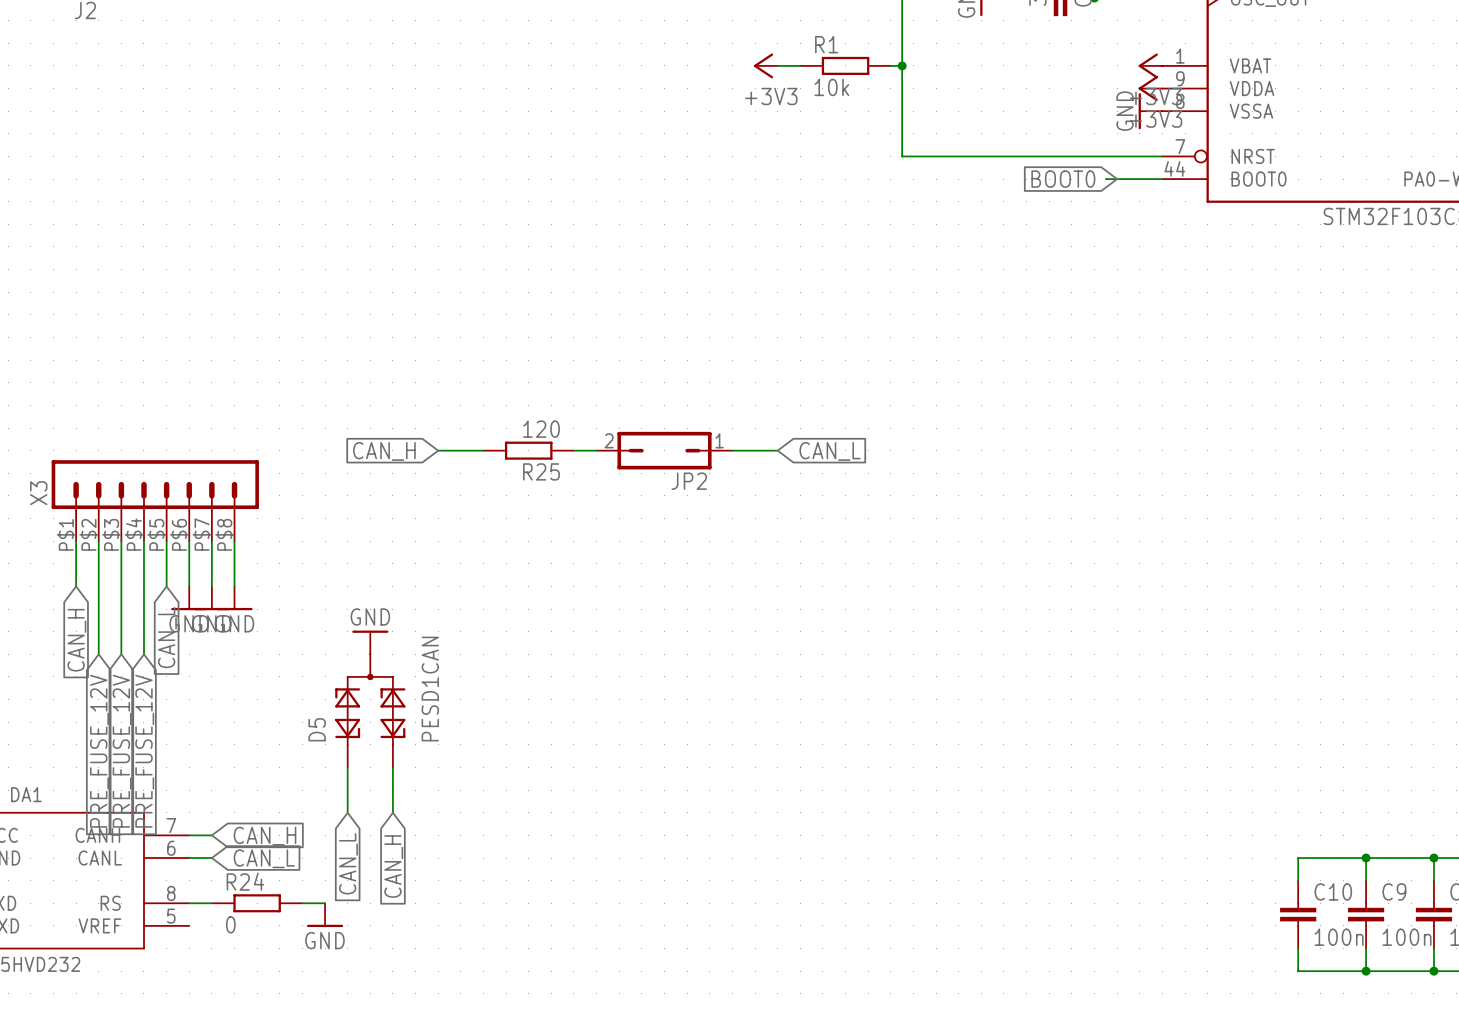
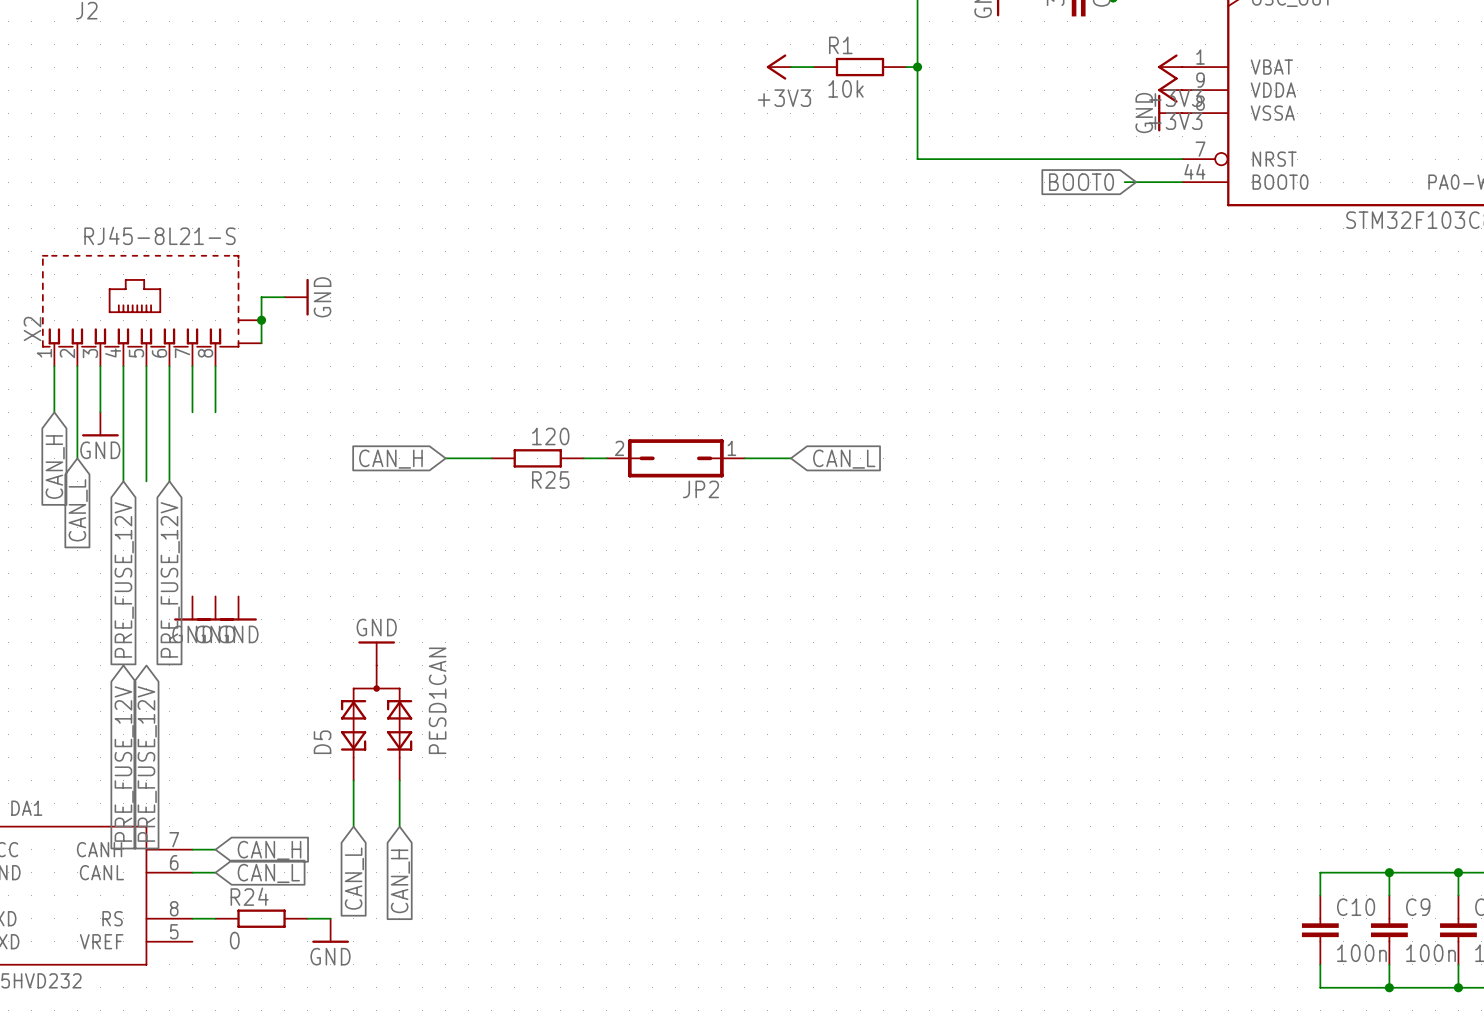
wire: none -> (284, 297) (261, 297) (261, 343)
power symbol: none -> GND (296, 297)
X2: none -> RJ45-8L21-S (151, 310)
junction: none -> (261, 320)
wire: none -> (54, 366) (54, 412)
wire: none -> (77, 366) (77, 458)
power symbol: none -> GND (100, 424)
X3: (155, 500) -> none
wire: (76, 541) (76, 586) -> (100, 366) (100, 412)
wire: (98, 541) (98, 654) -> (123, 366) (123, 481)
wire: (121, 541) (121, 654) -> (146, 366) (146, 481)
wire: (143, 541) (143, 654) -> (169, 366) (169, 481)
wire: (166, 541) (166, 586) -> (192, 366) (192, 412)
wire: (189, 541) (189, 586) -> (215, 366) (215, 412)
wire: (211, 541) (211, 586) -> none
wire: (234, 541) (234, 586) -> none
global label: none -> PRE_FUSE_12V (170, 579)
global label position: CAN_L (167, 637) -> CAN_L (78, 510)
global label position: CAN_H (76, 640) -> CAN_H (55, 467)
global label position: PRE_FUSE_12V (99, 751) -> PRE_FUSE_12V (124, 579)

